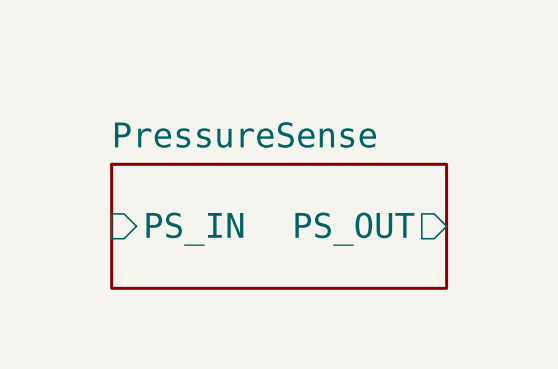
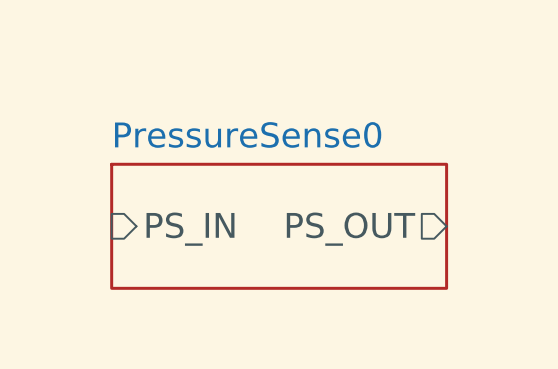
sheet PressureSense name: PressureSense (245, 134) -> PressureSense0 (248, 134)

